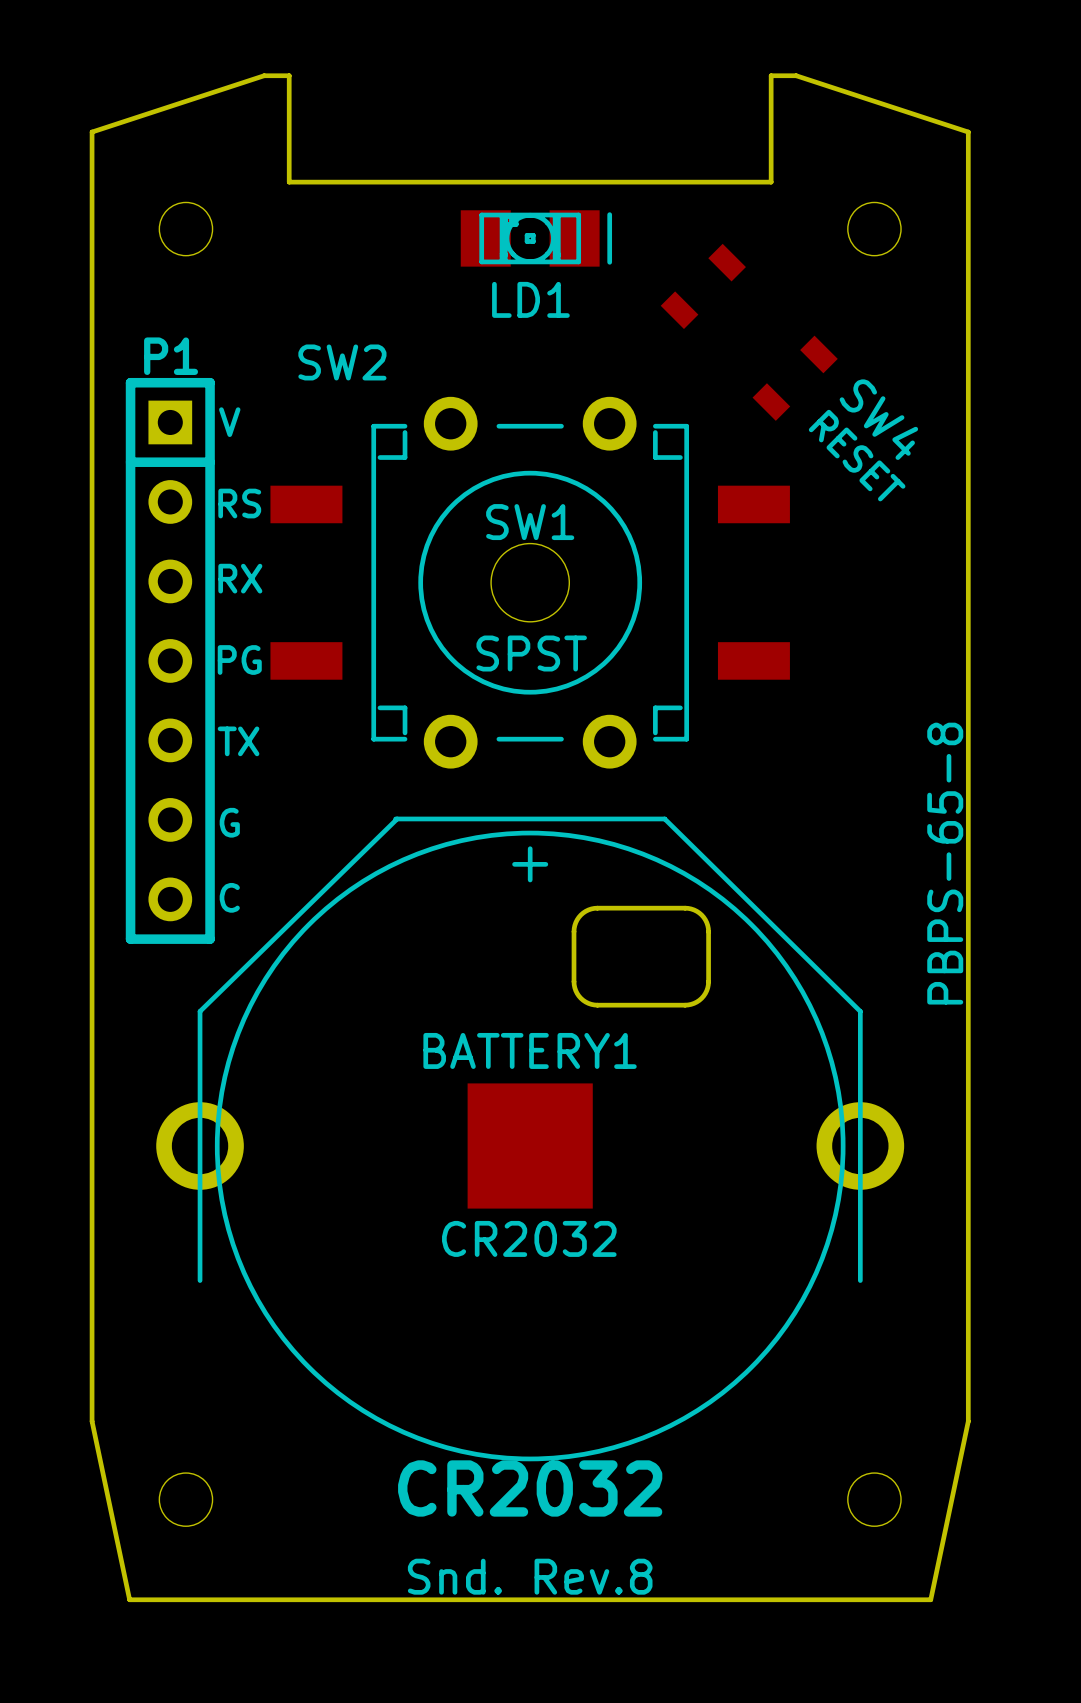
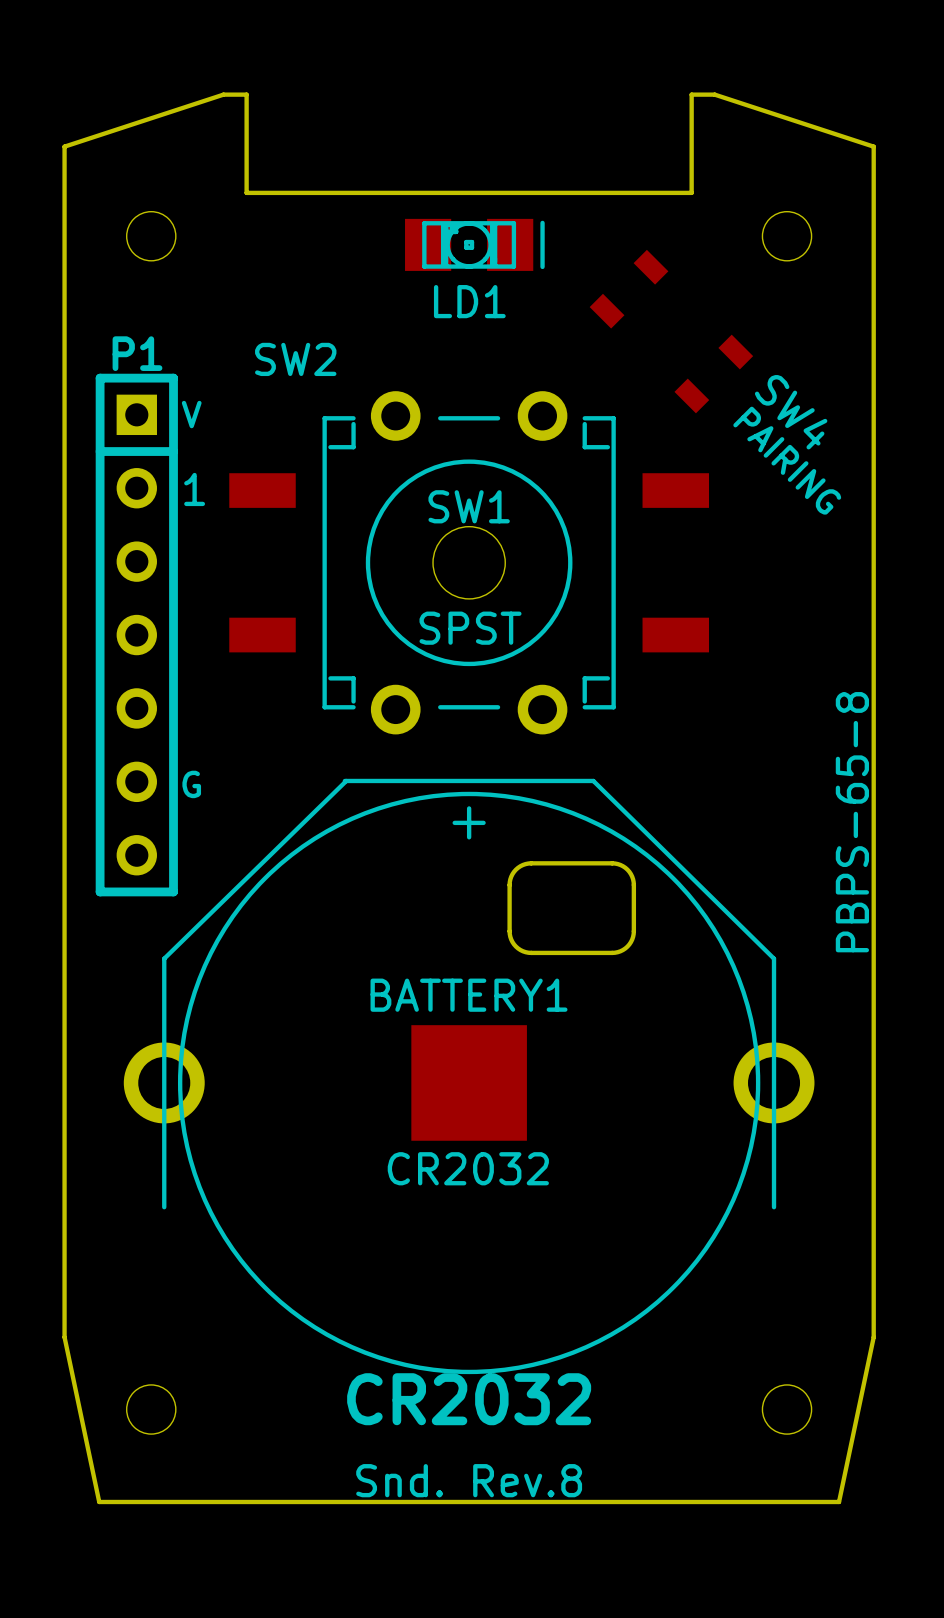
text: RESET (857, 455) -> PAIRING (787, 460)
P1 text: none -> 1 (194, 489)
P1 text: RS (239, 503) -> none
P1 text: RX (240, 578) -> none
P1 text: PG (239, 660) -> none
P1 text: TX (238, 741) -> none
P1 text: C (229, 897) -> none

